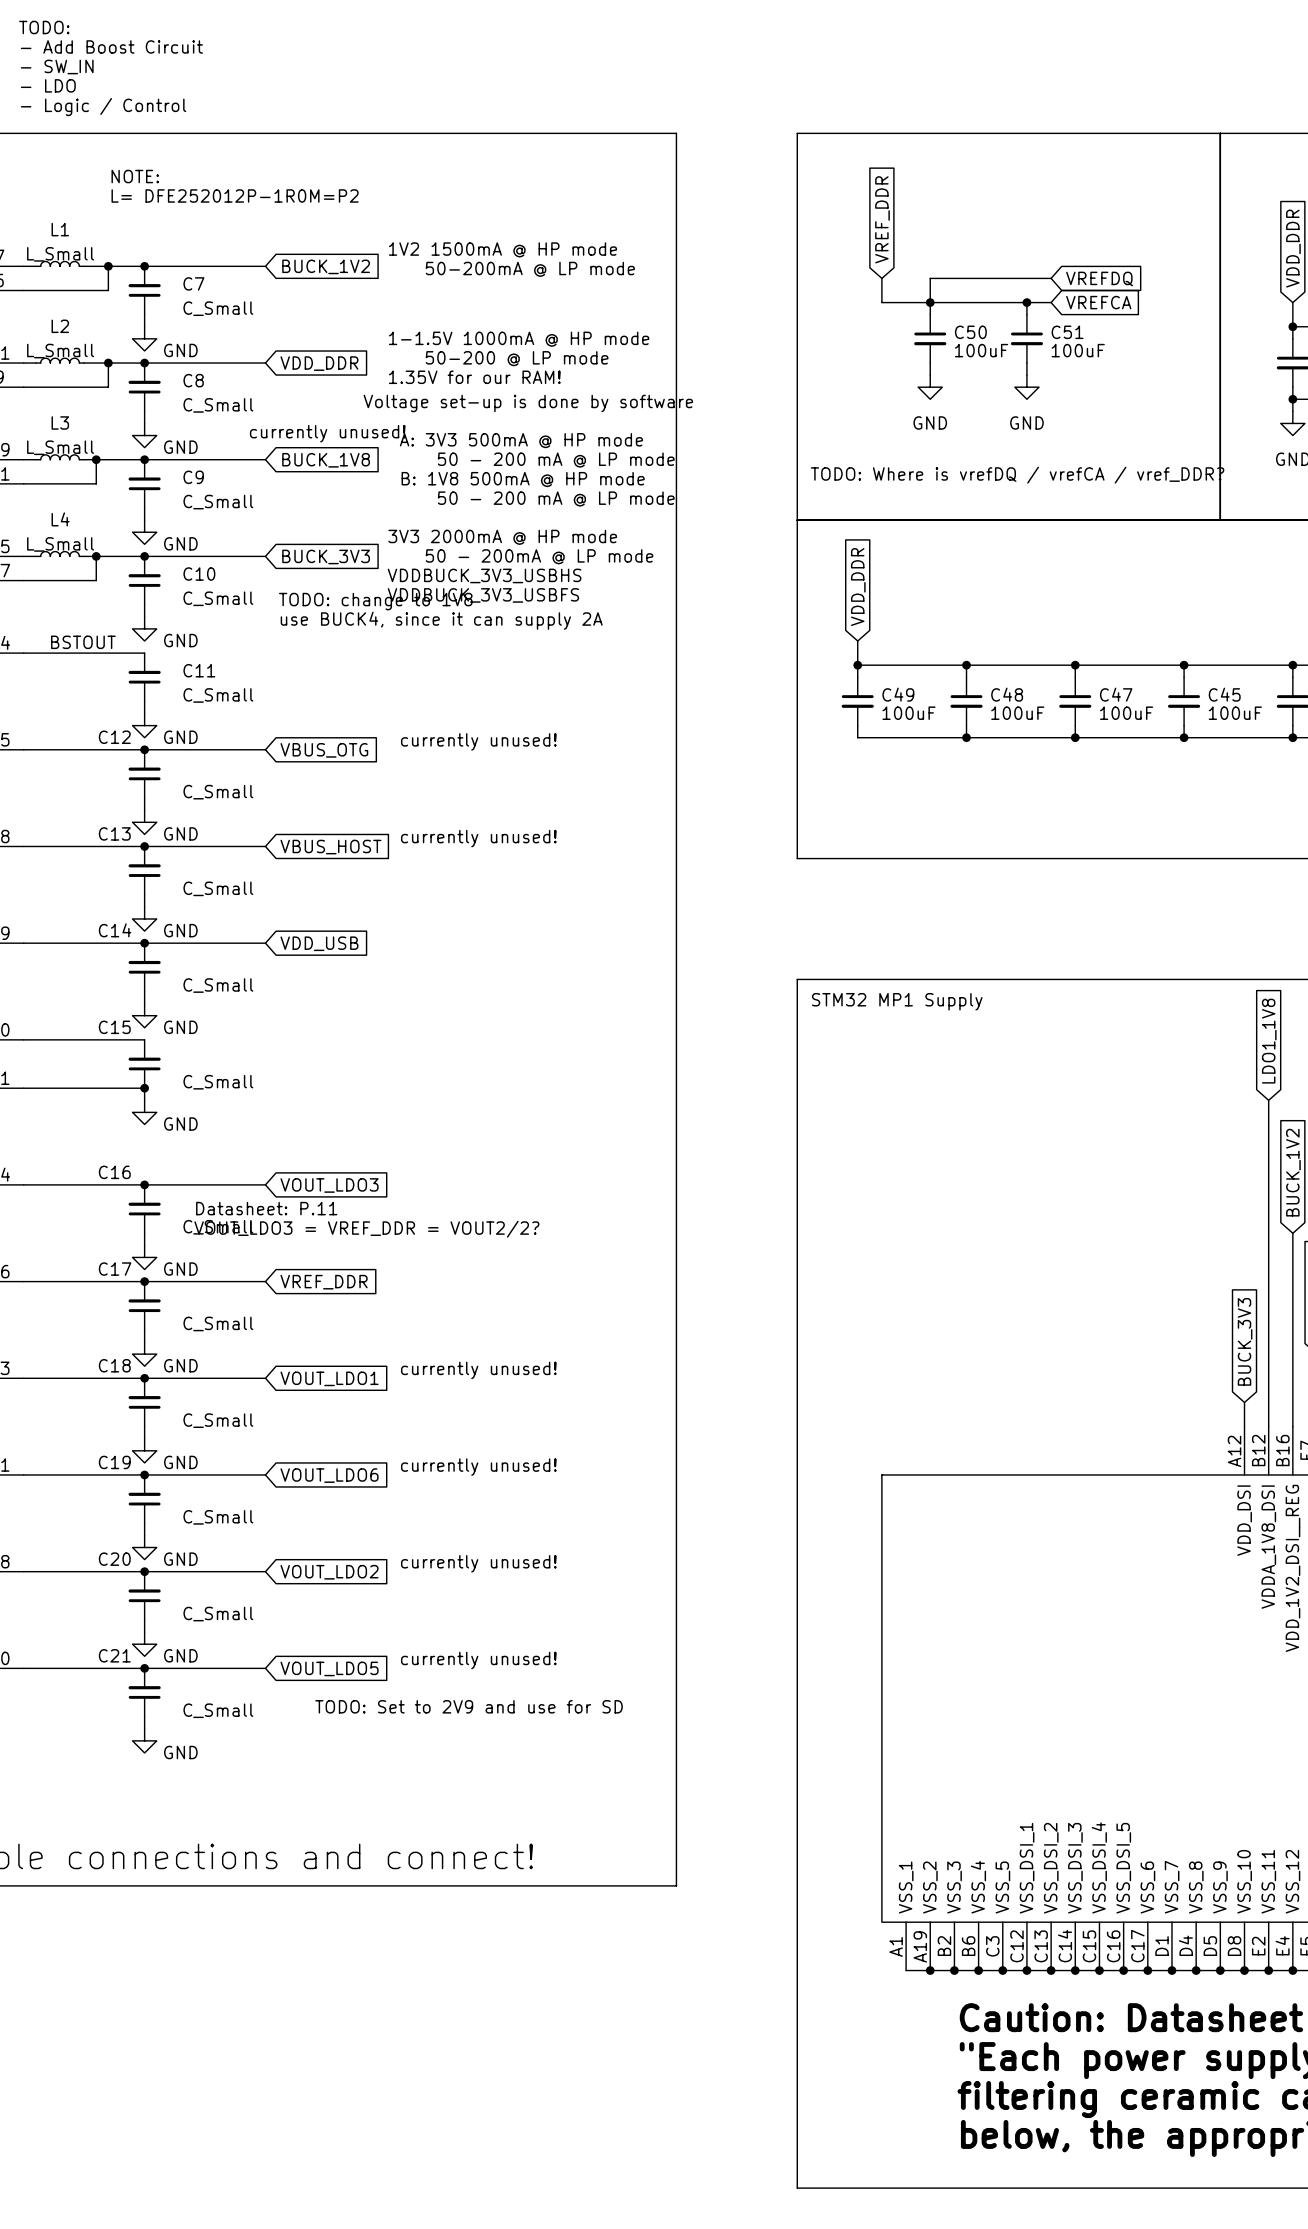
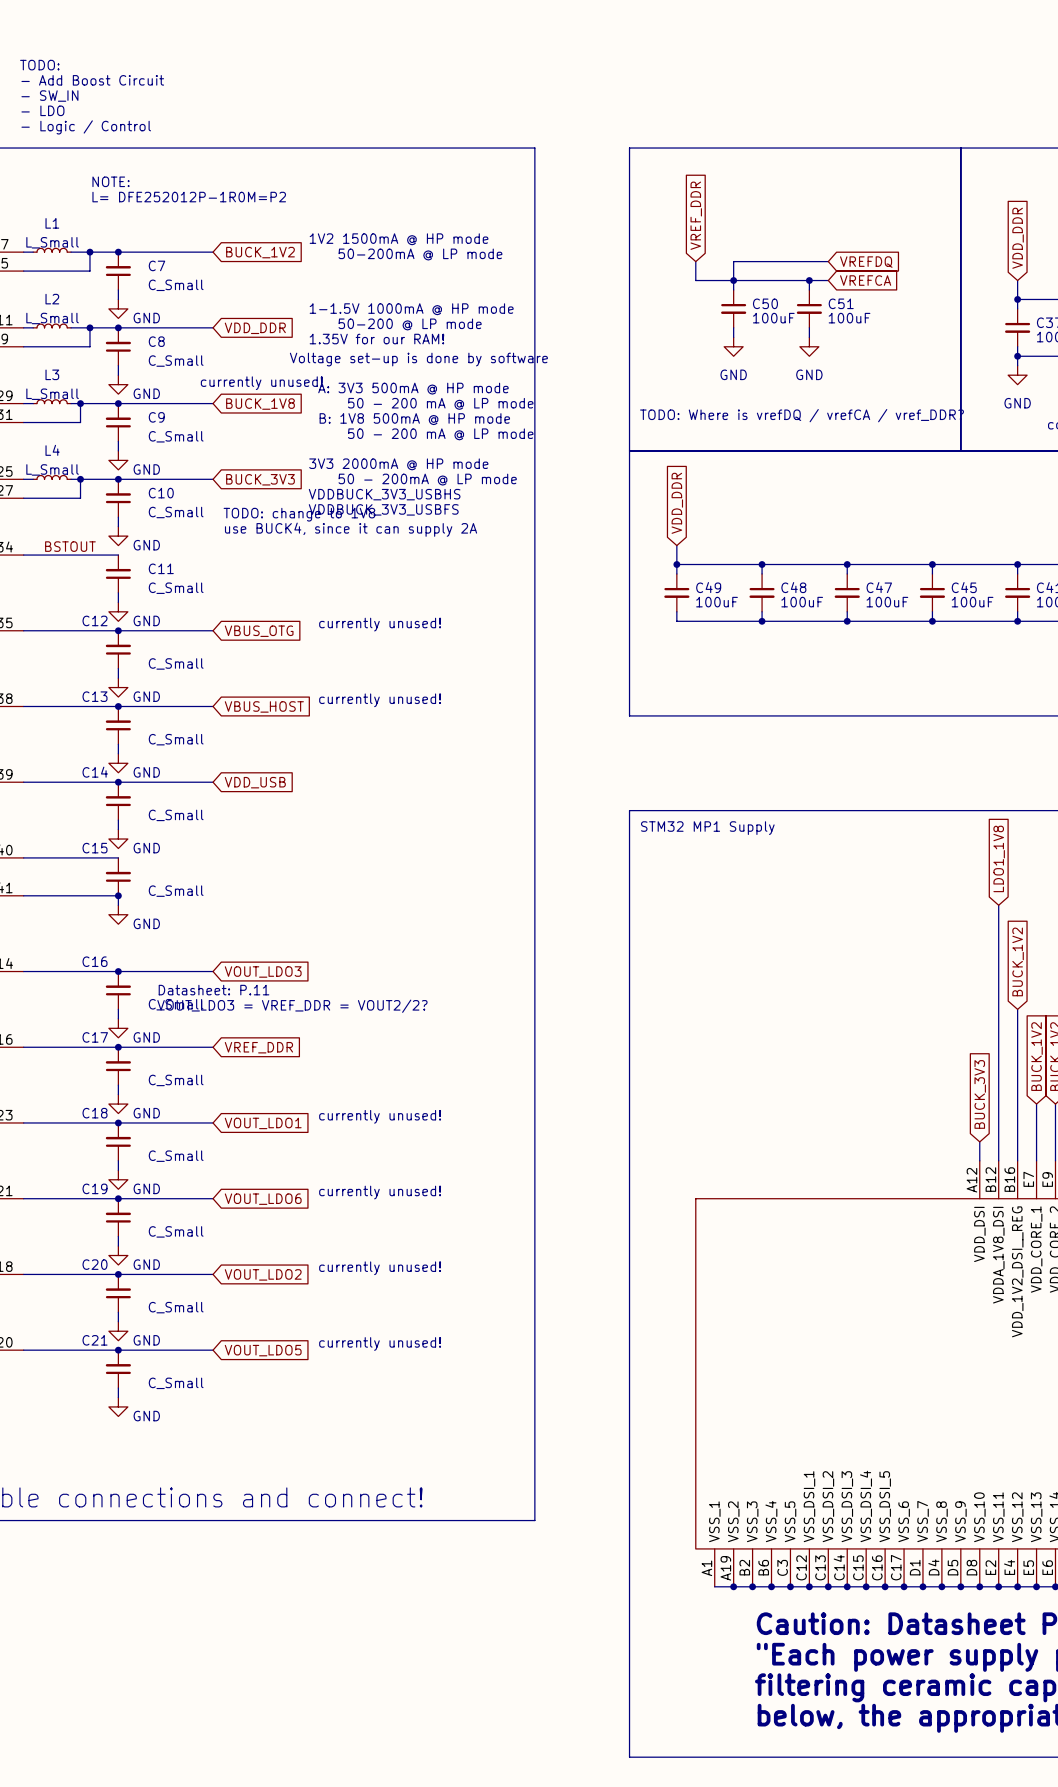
text: TODO: Set to 2V9 and use for SD (469, 1706) -> none

